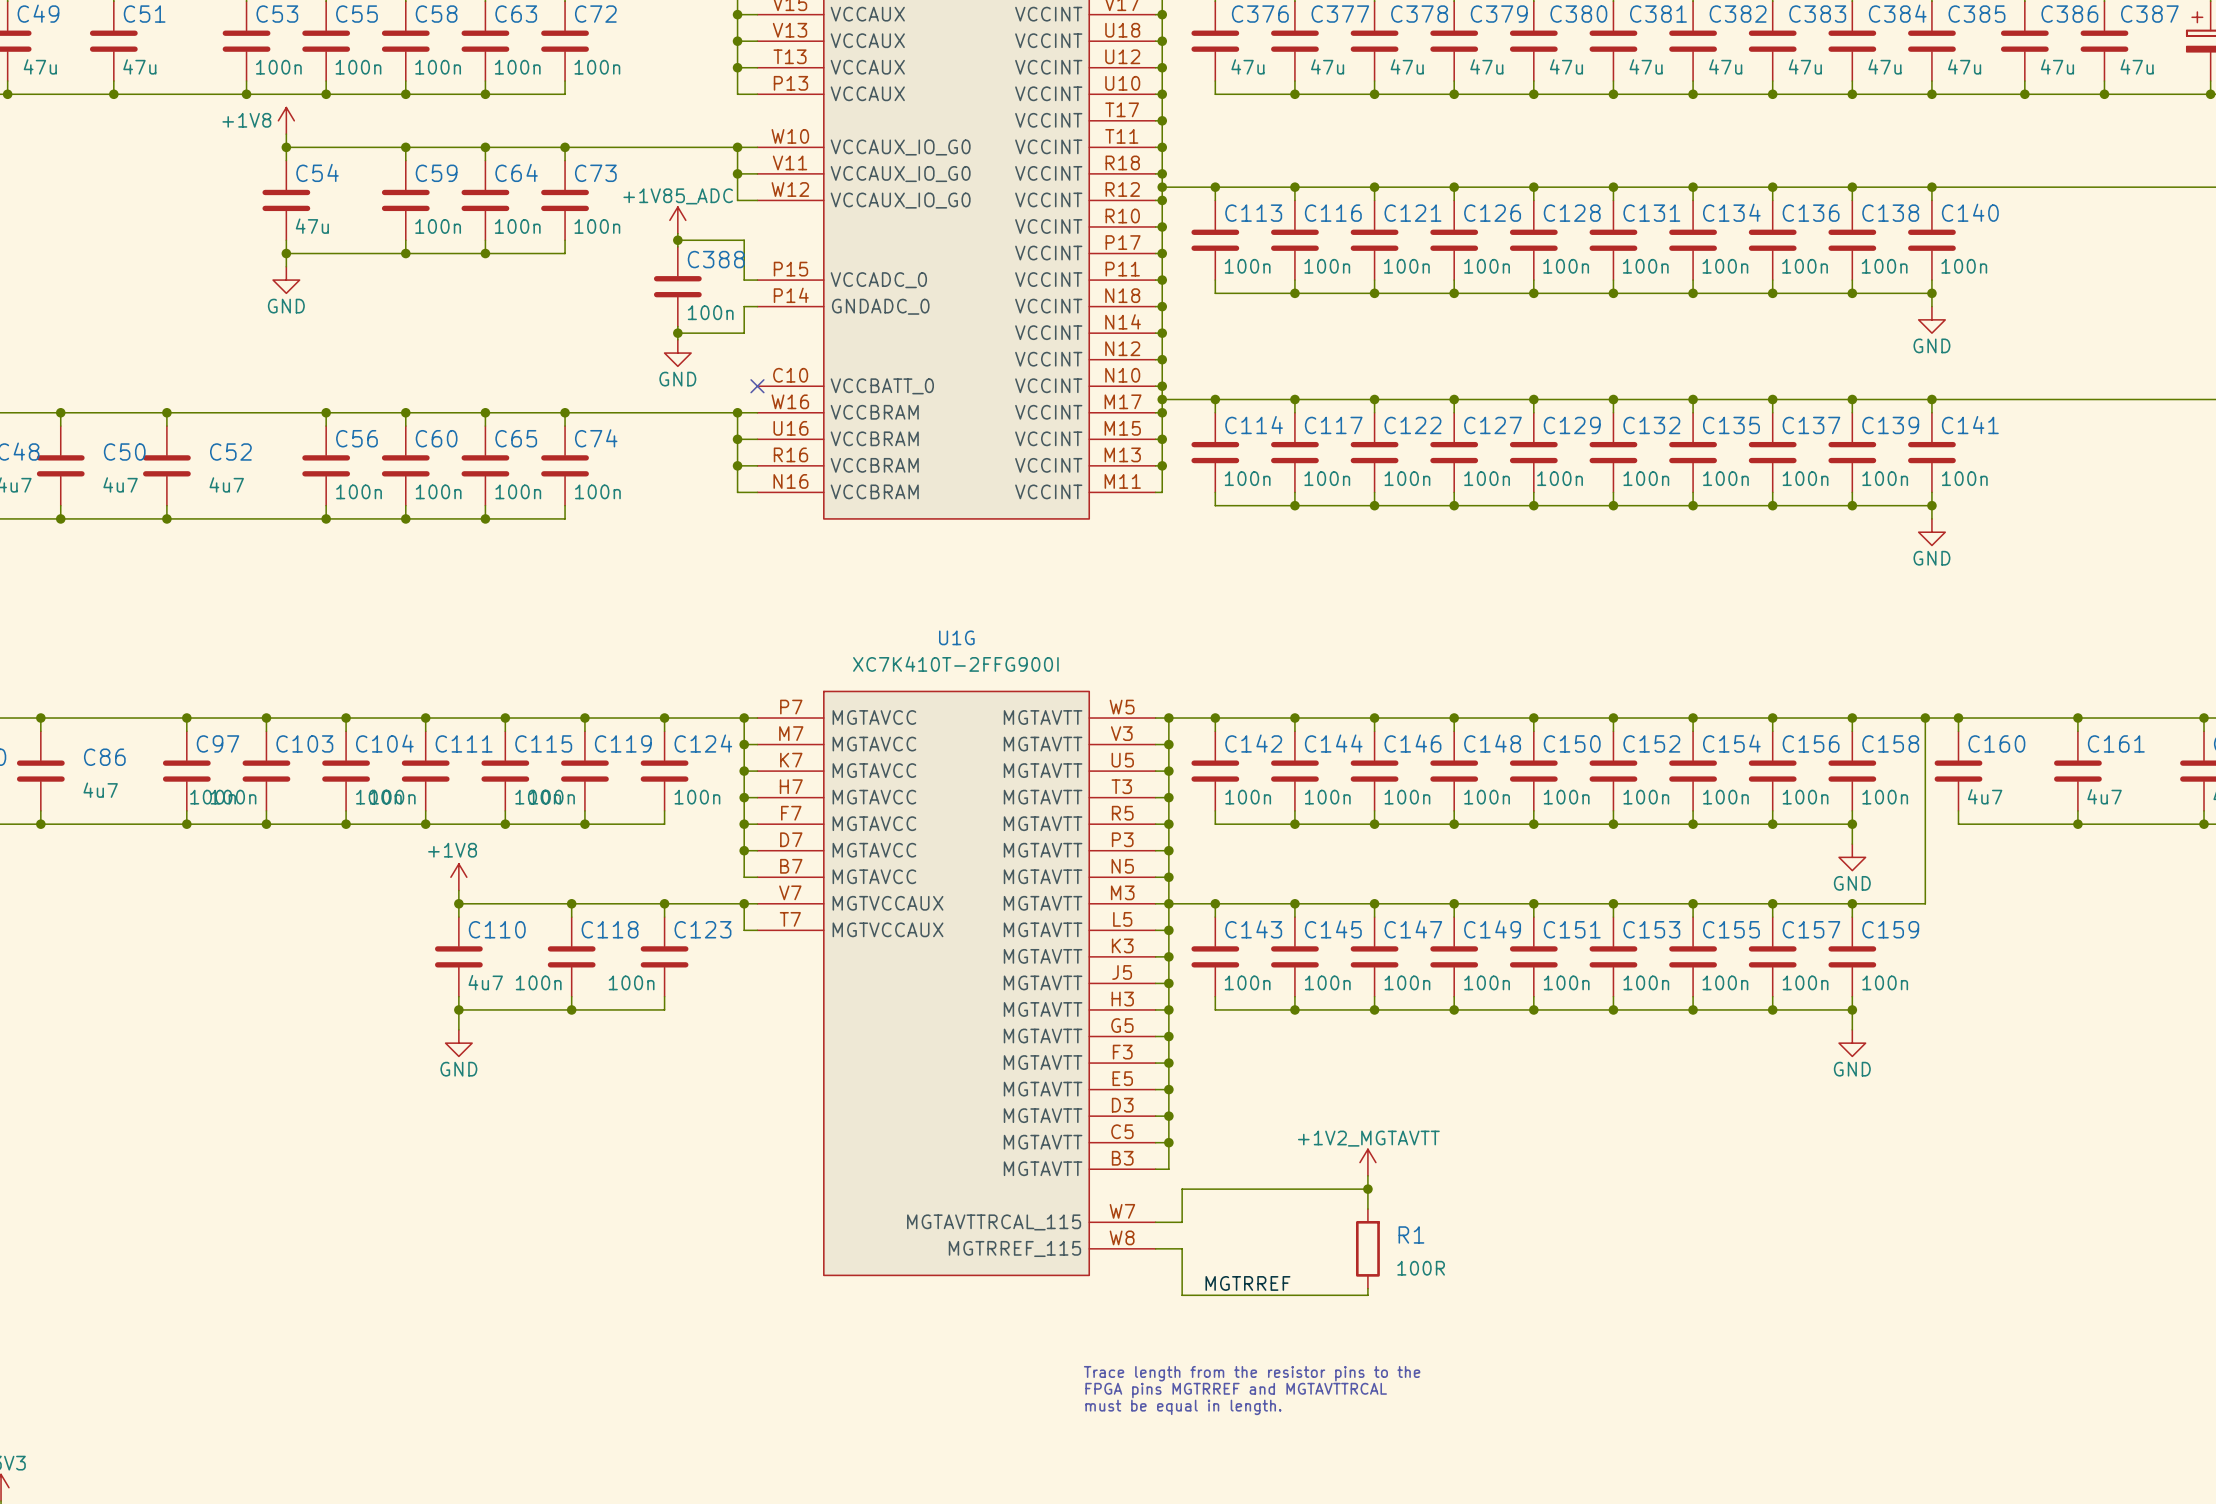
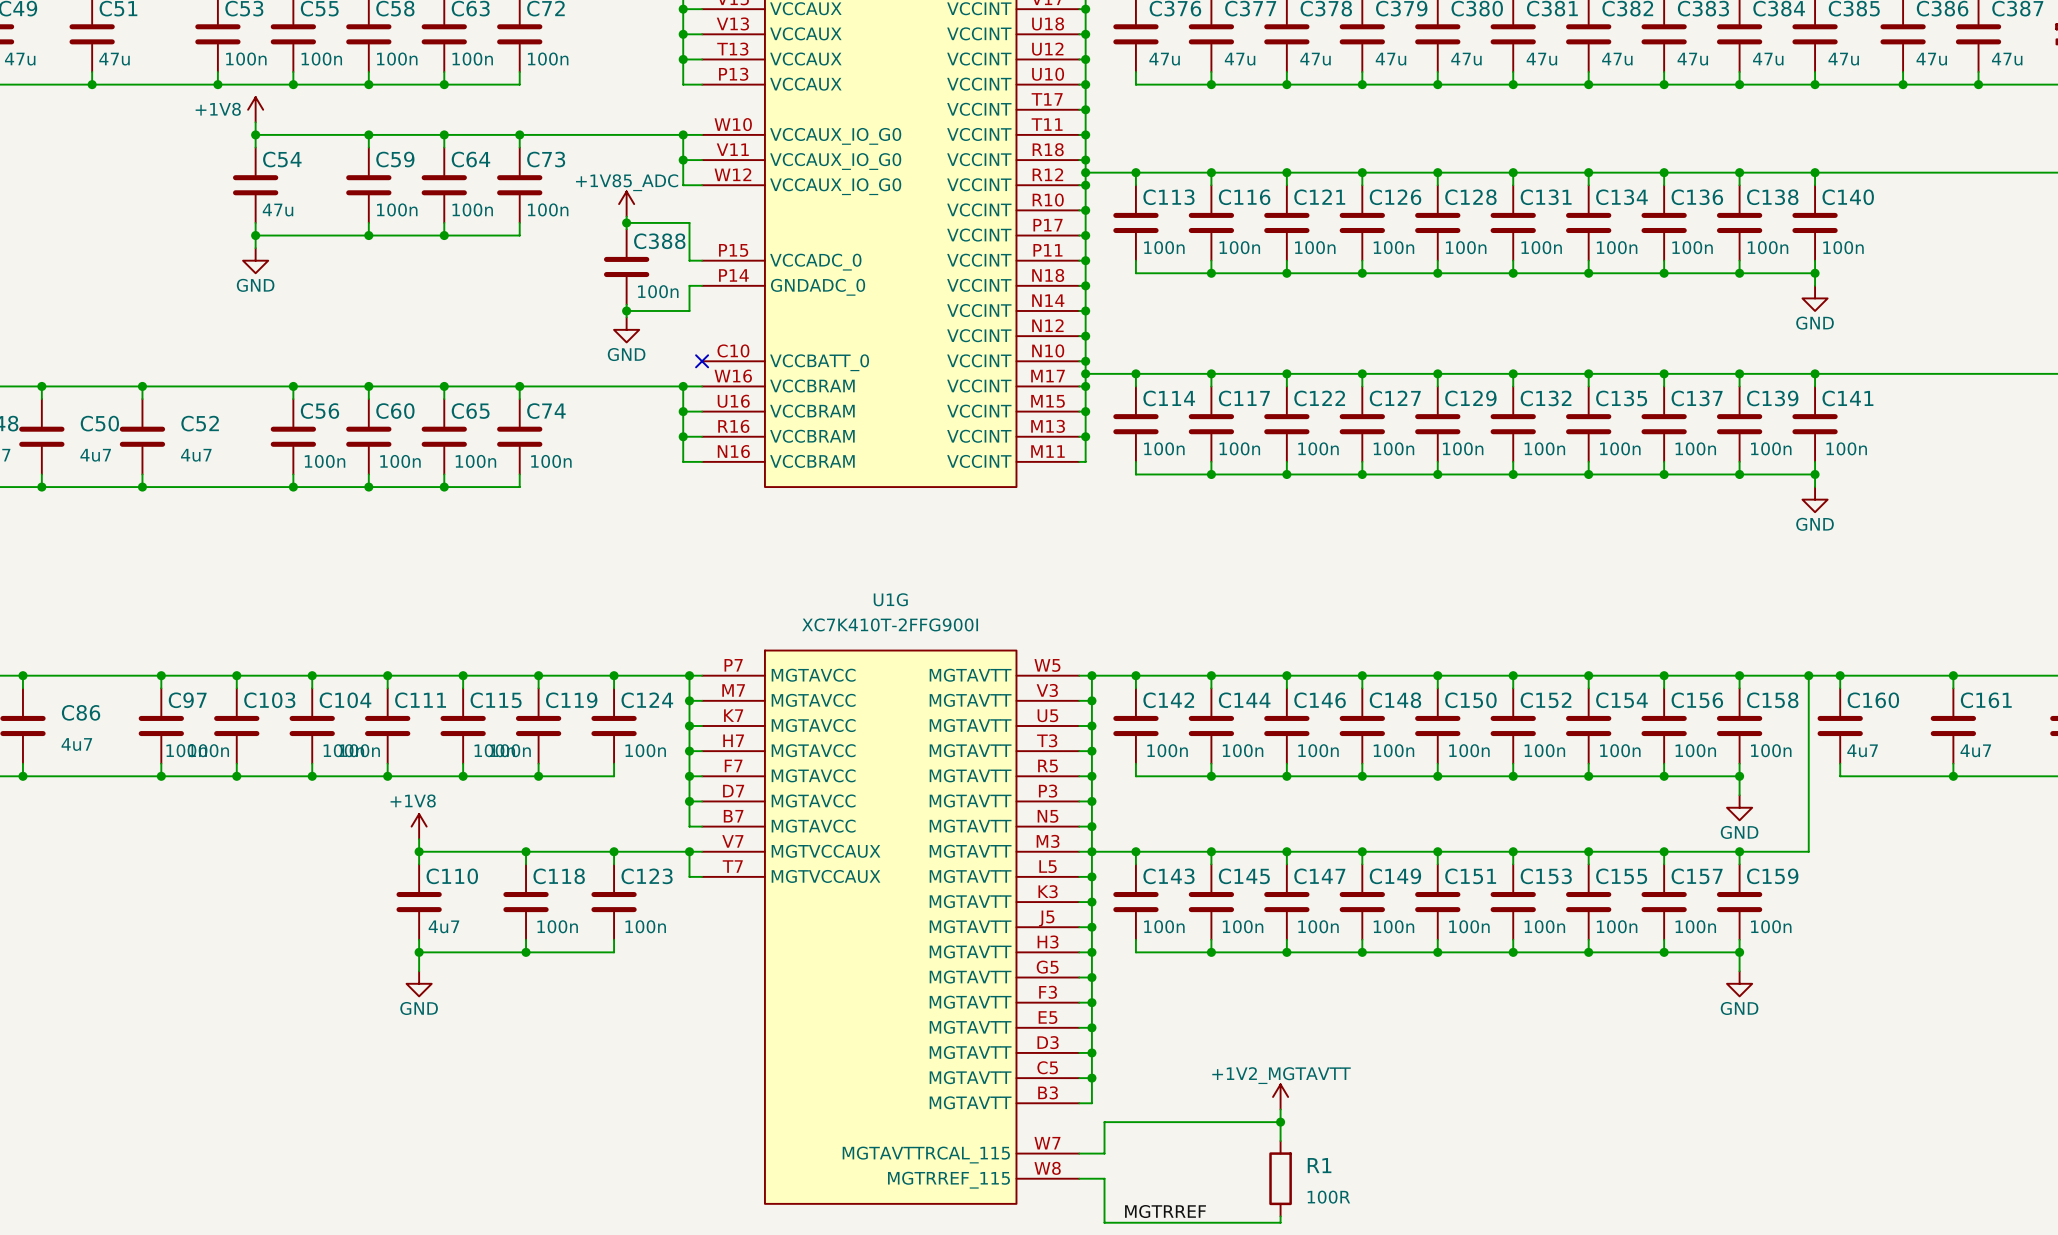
C118 text position: 100n (538, 982) -> 100n (557, 926)
C123 text position: 100n (631, 982) -> 100n (645, 926)

